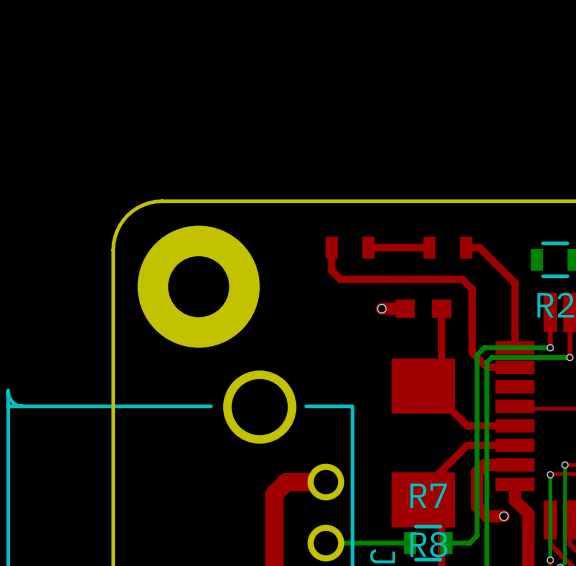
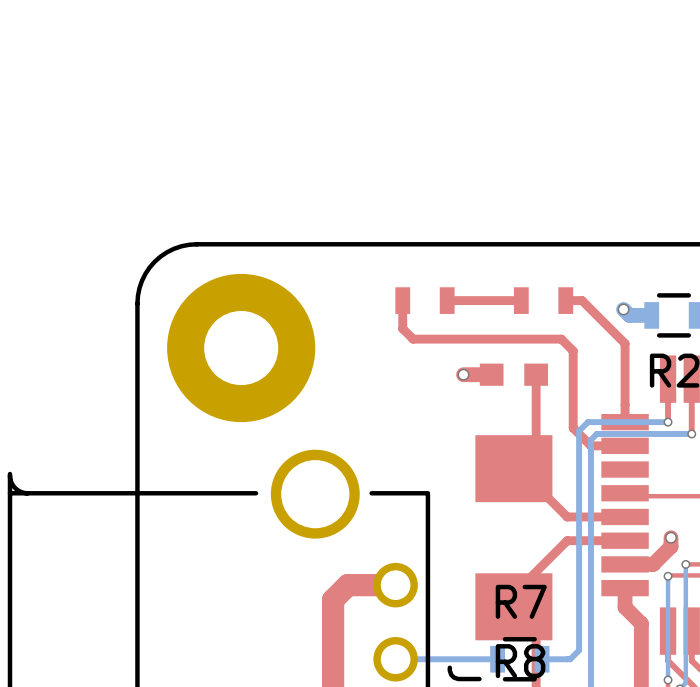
bottom track: none -> (623, 309) (629, 315) (651, 315)
via: none -> (623, 309)
top track: (514, 464) (484, 464) (477, 472) (477, 506) (486, 516) (503, 516) -> (625, 564) (653, 564) (671, 546) (671, 537)
via position: (503, 516) -> (671, 537)

